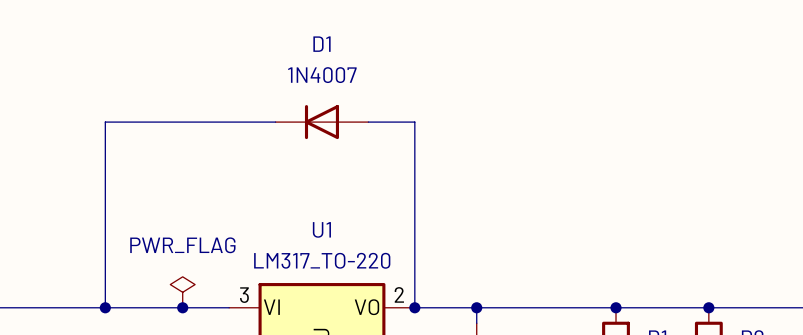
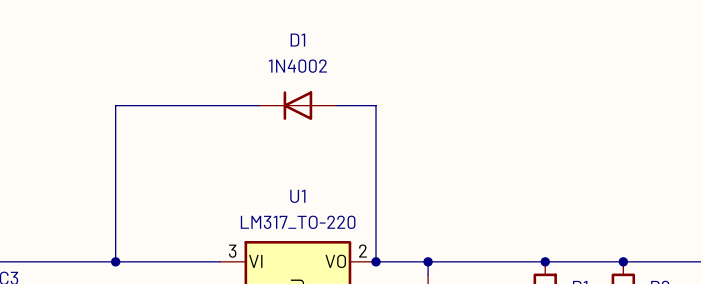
D1 value: 1N4007 (322, 75) -> 1N4002 (297, 66)
power symbol: PWR_FLAG (182, 292) -> none
junction: (182, 307) -> none

